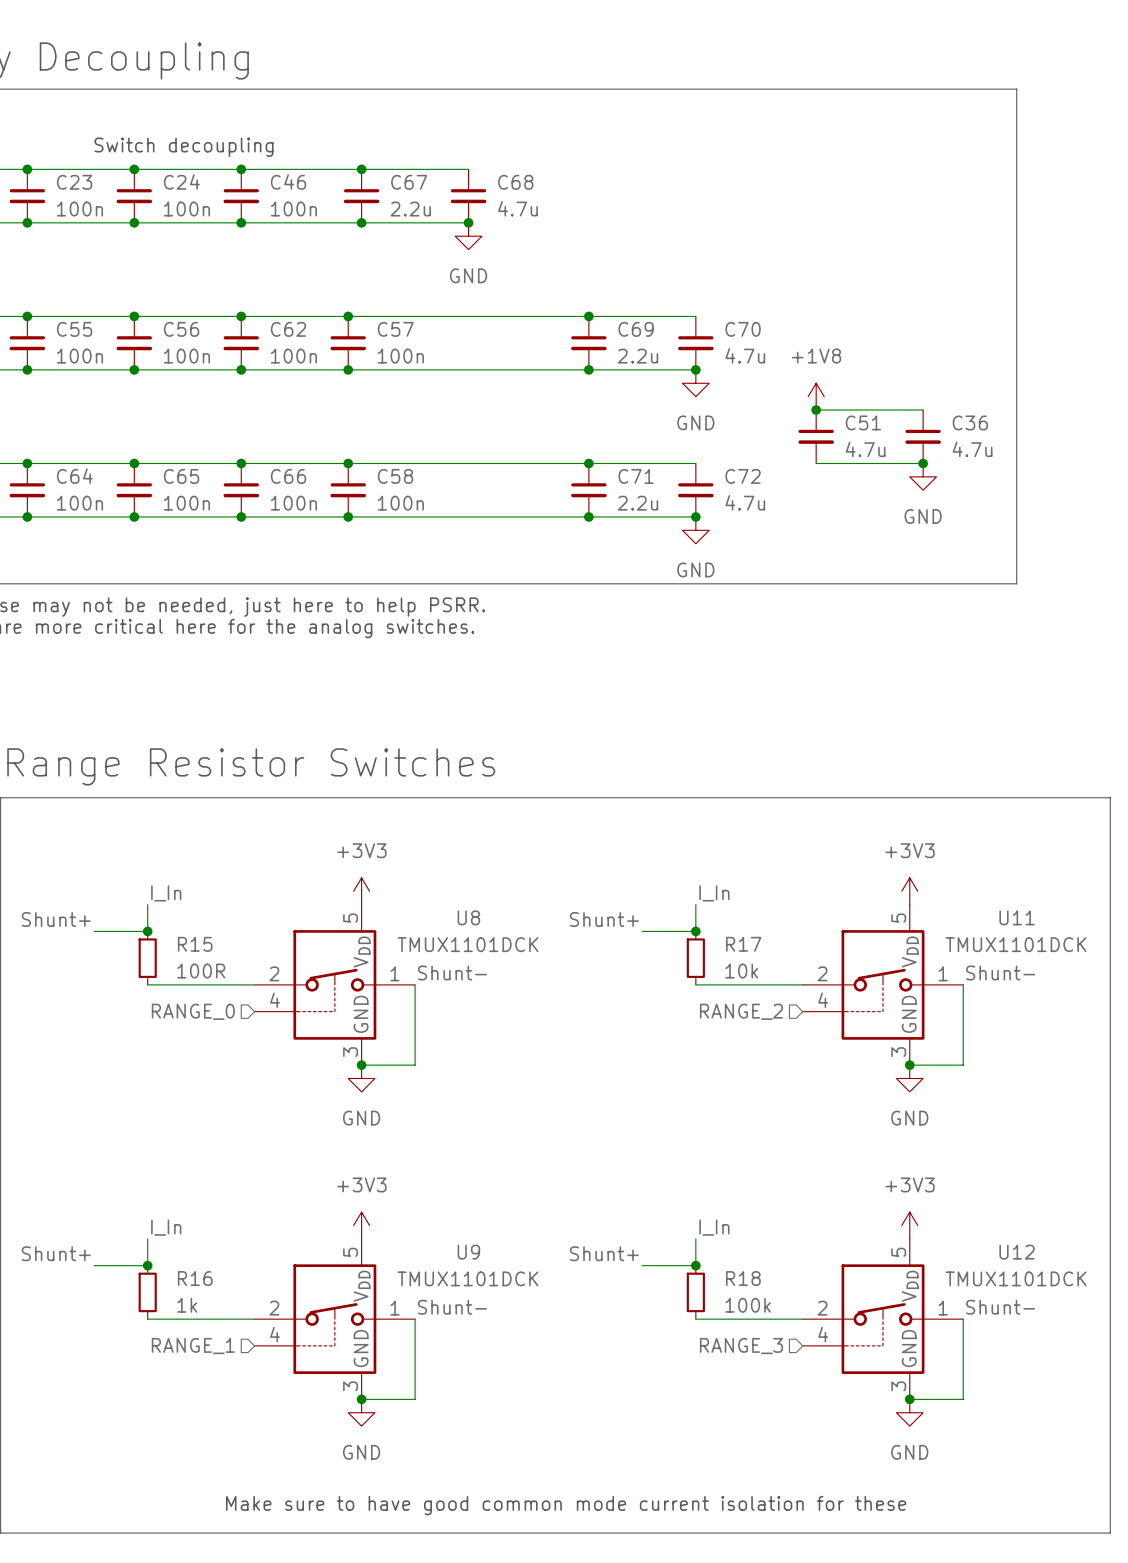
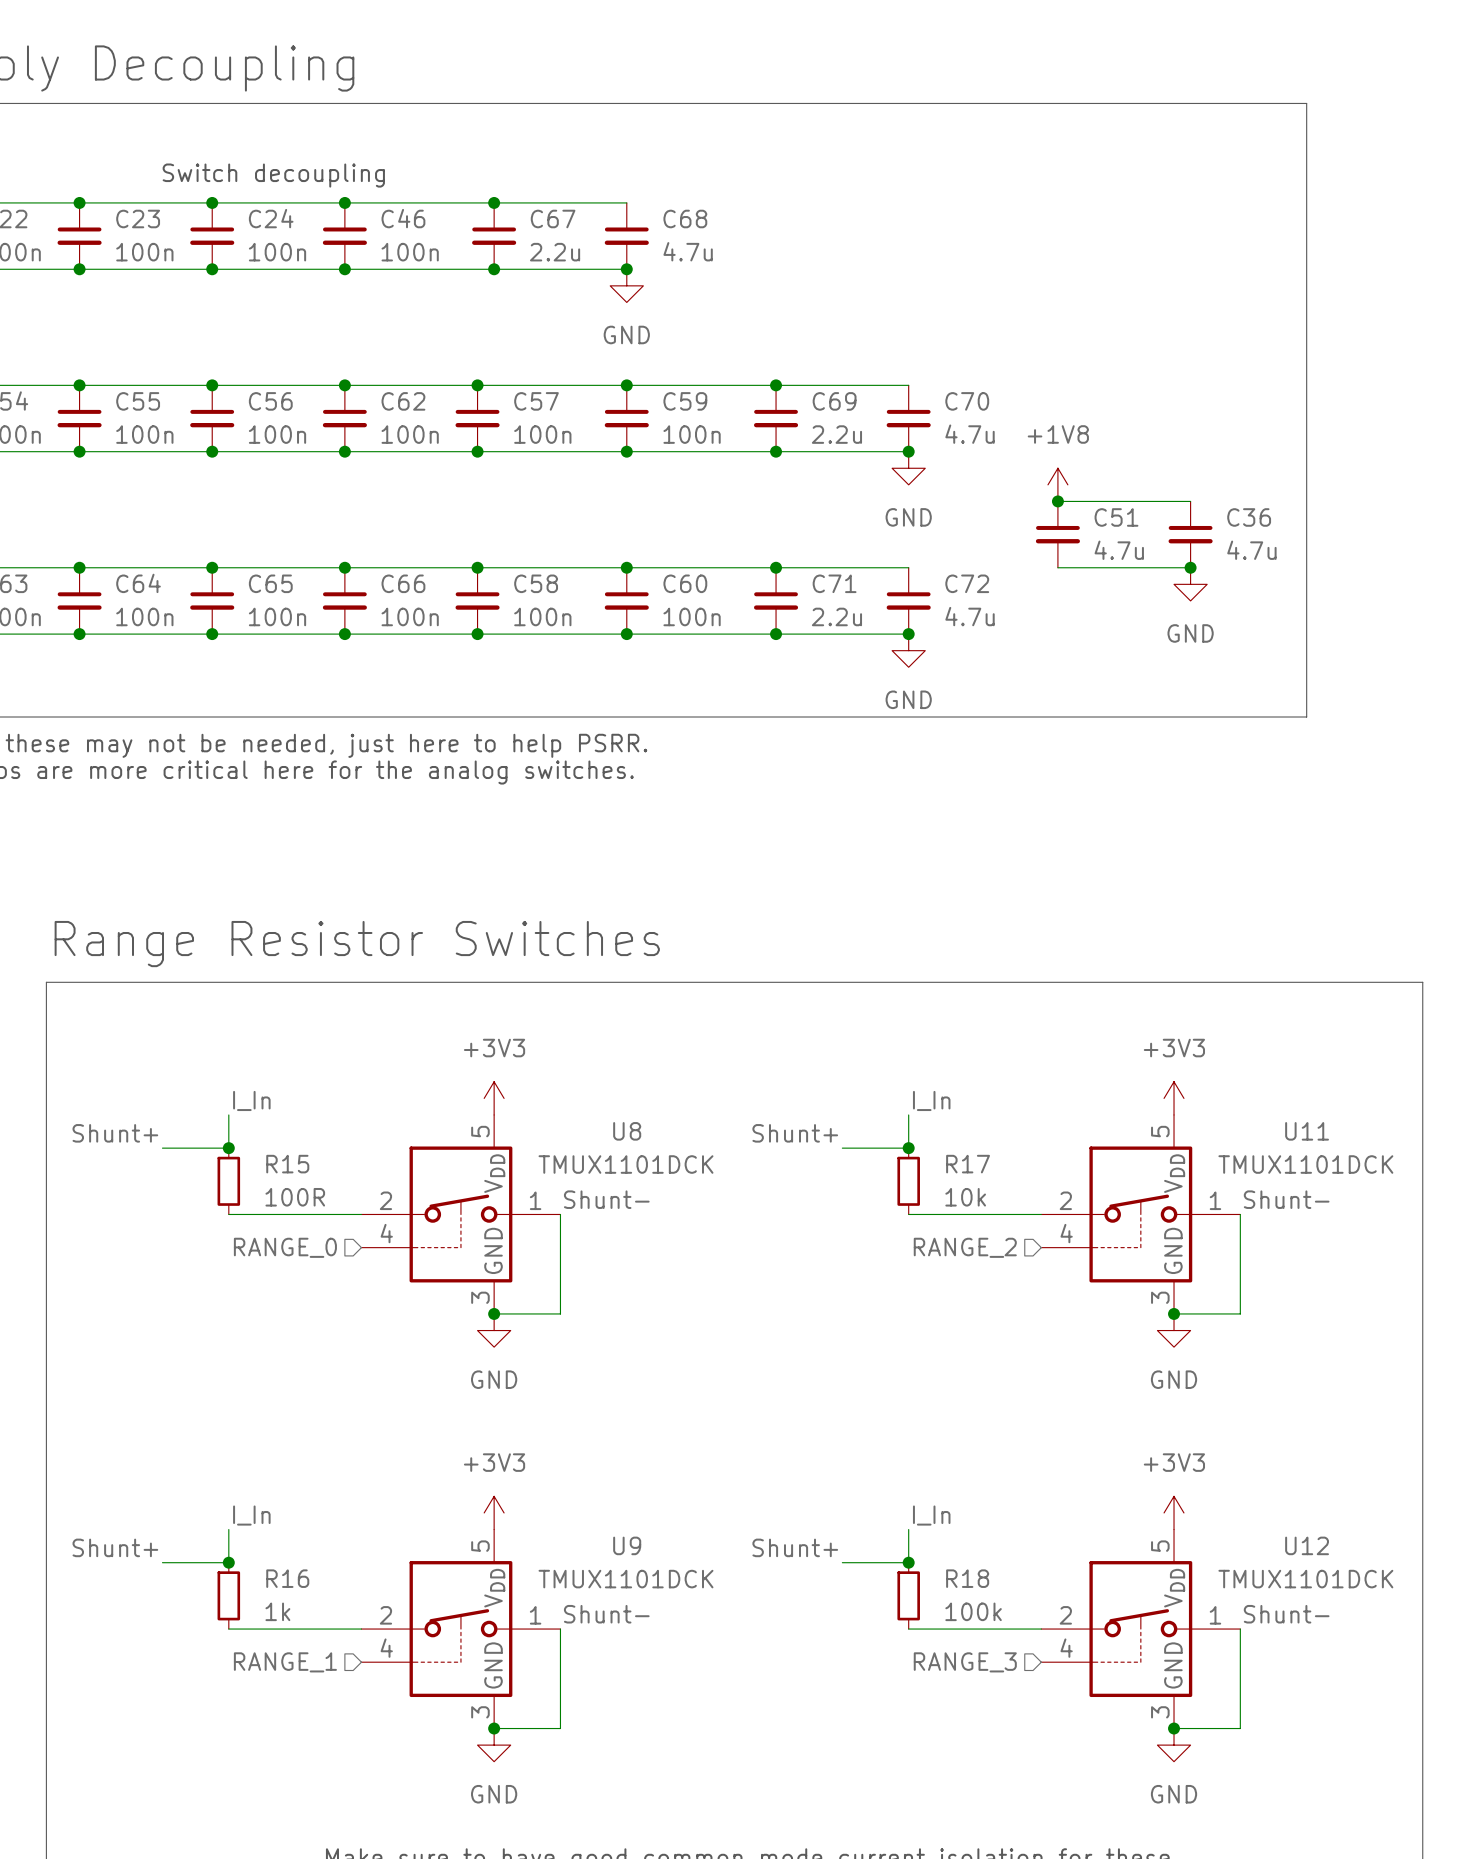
junction: none -> (626, 385)
C59: none -> 100n (626, 418)
junction: none -> (626, 451)
junction: none -> (626, 567)
C60: none -> 100n (626, 600)
junction: none -> (626, 634)

